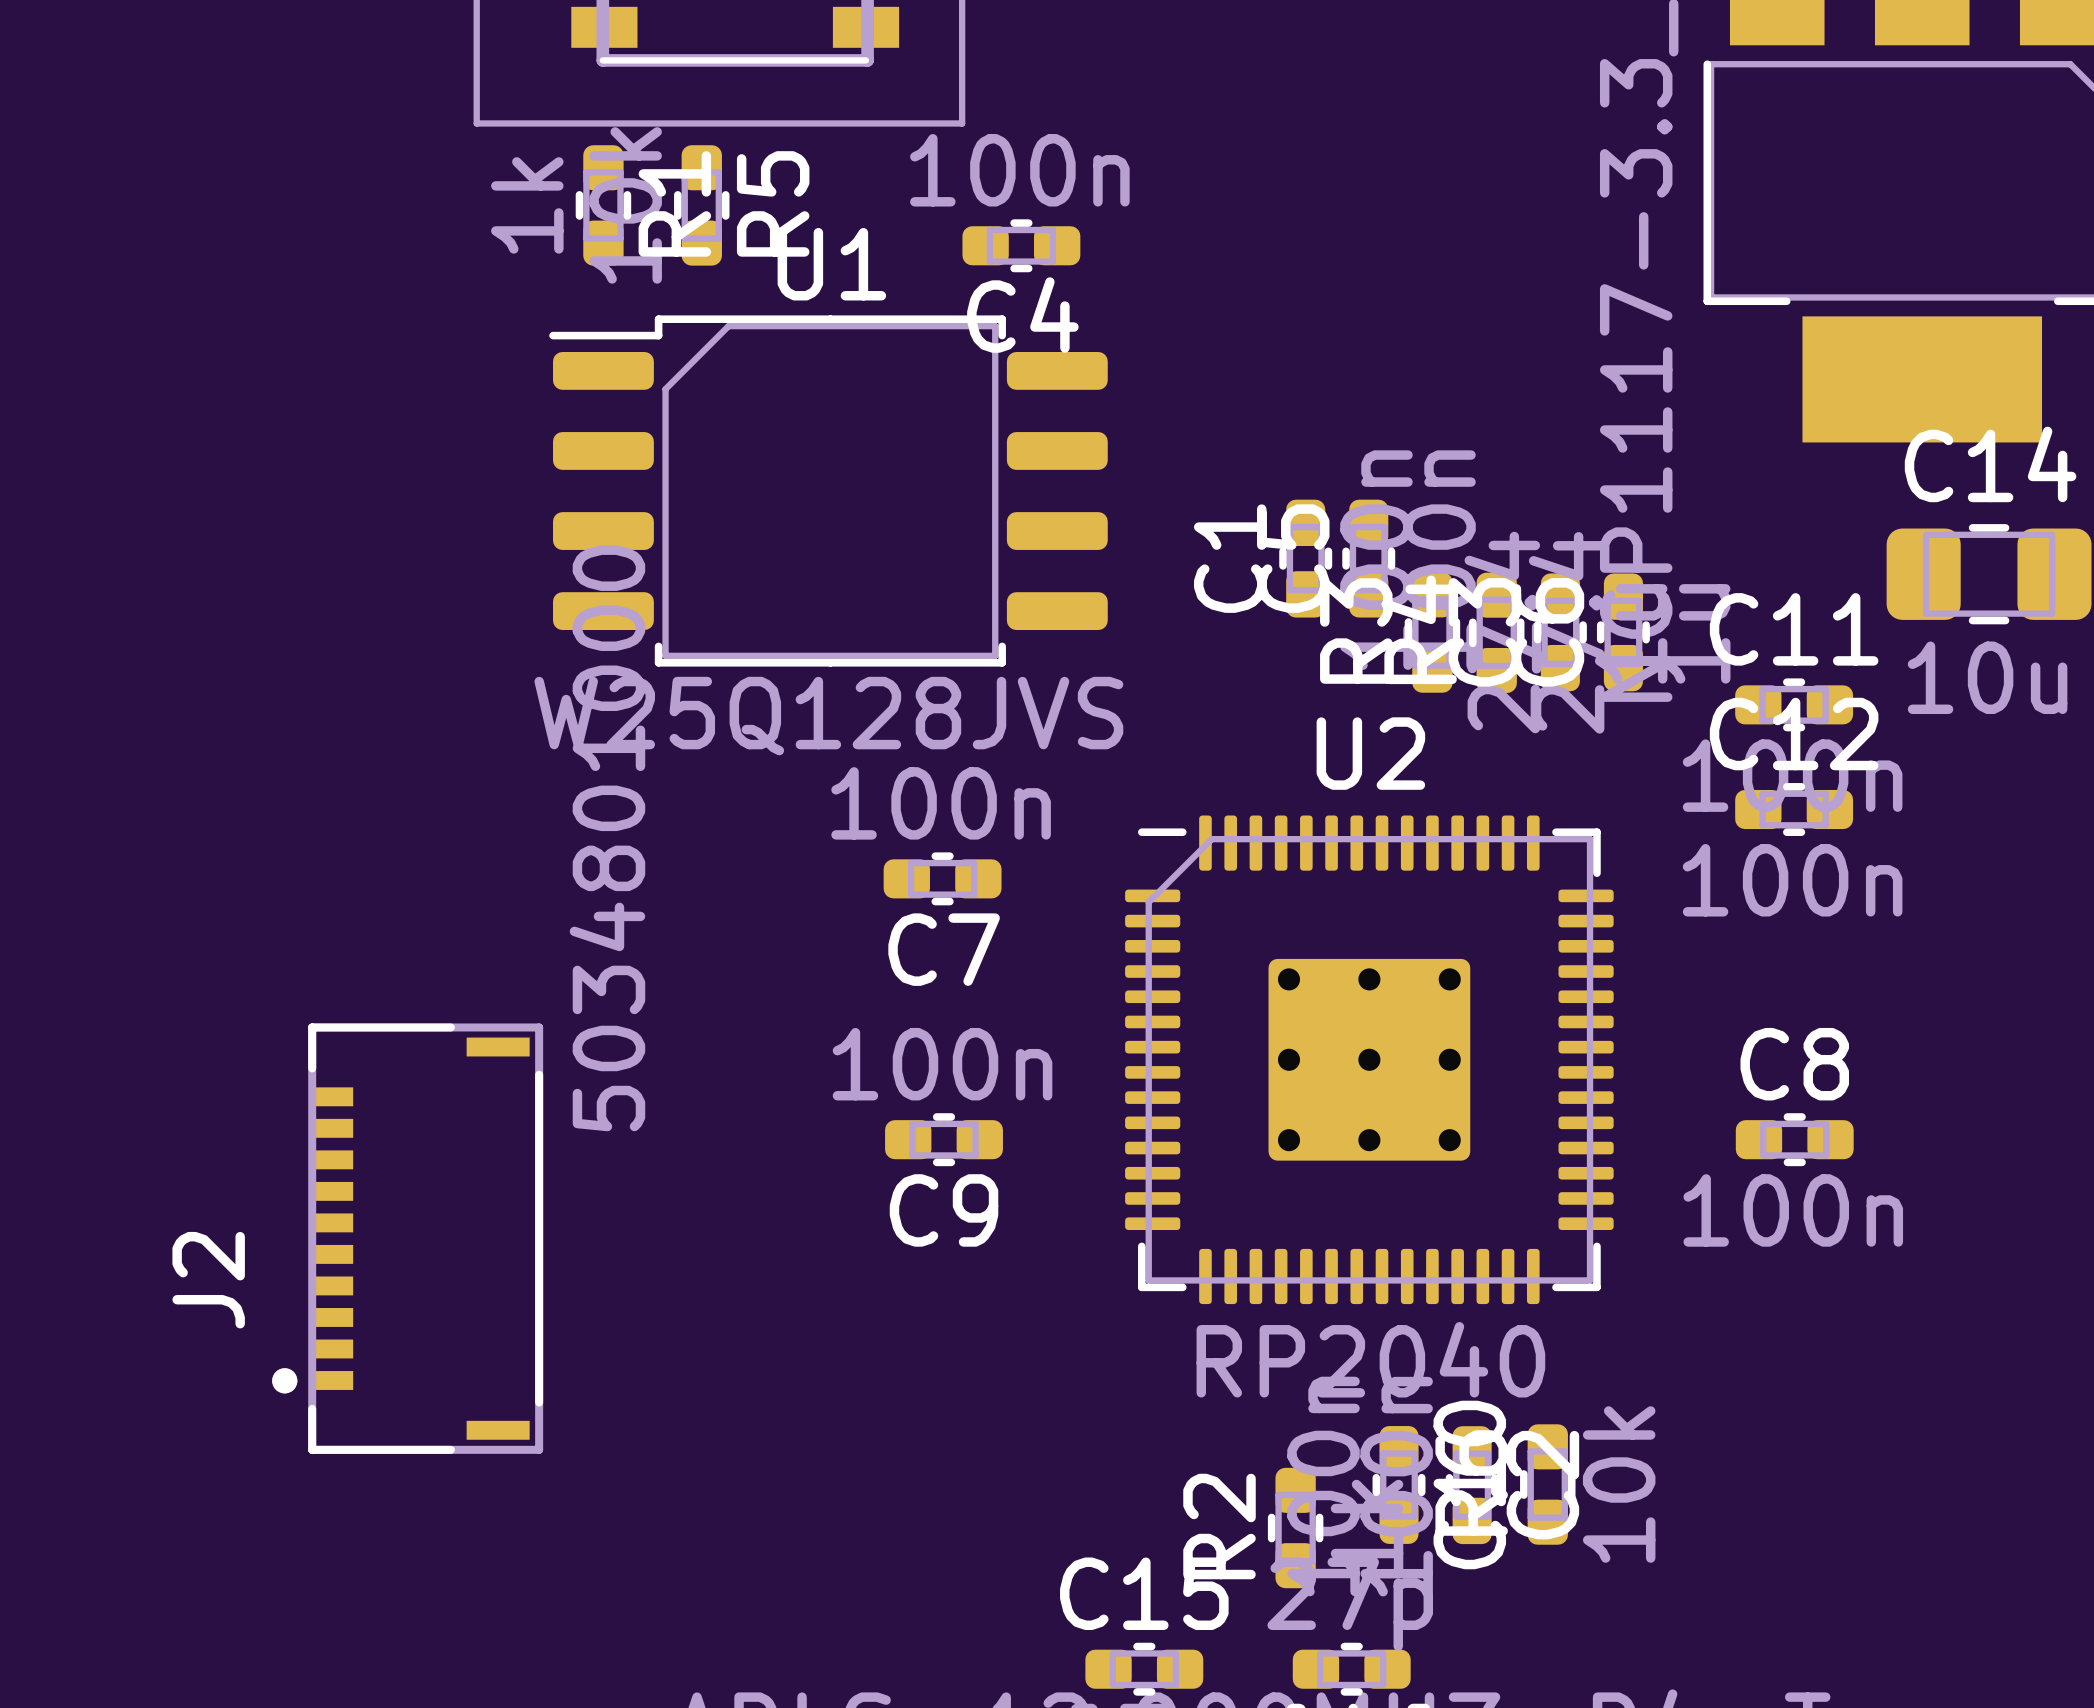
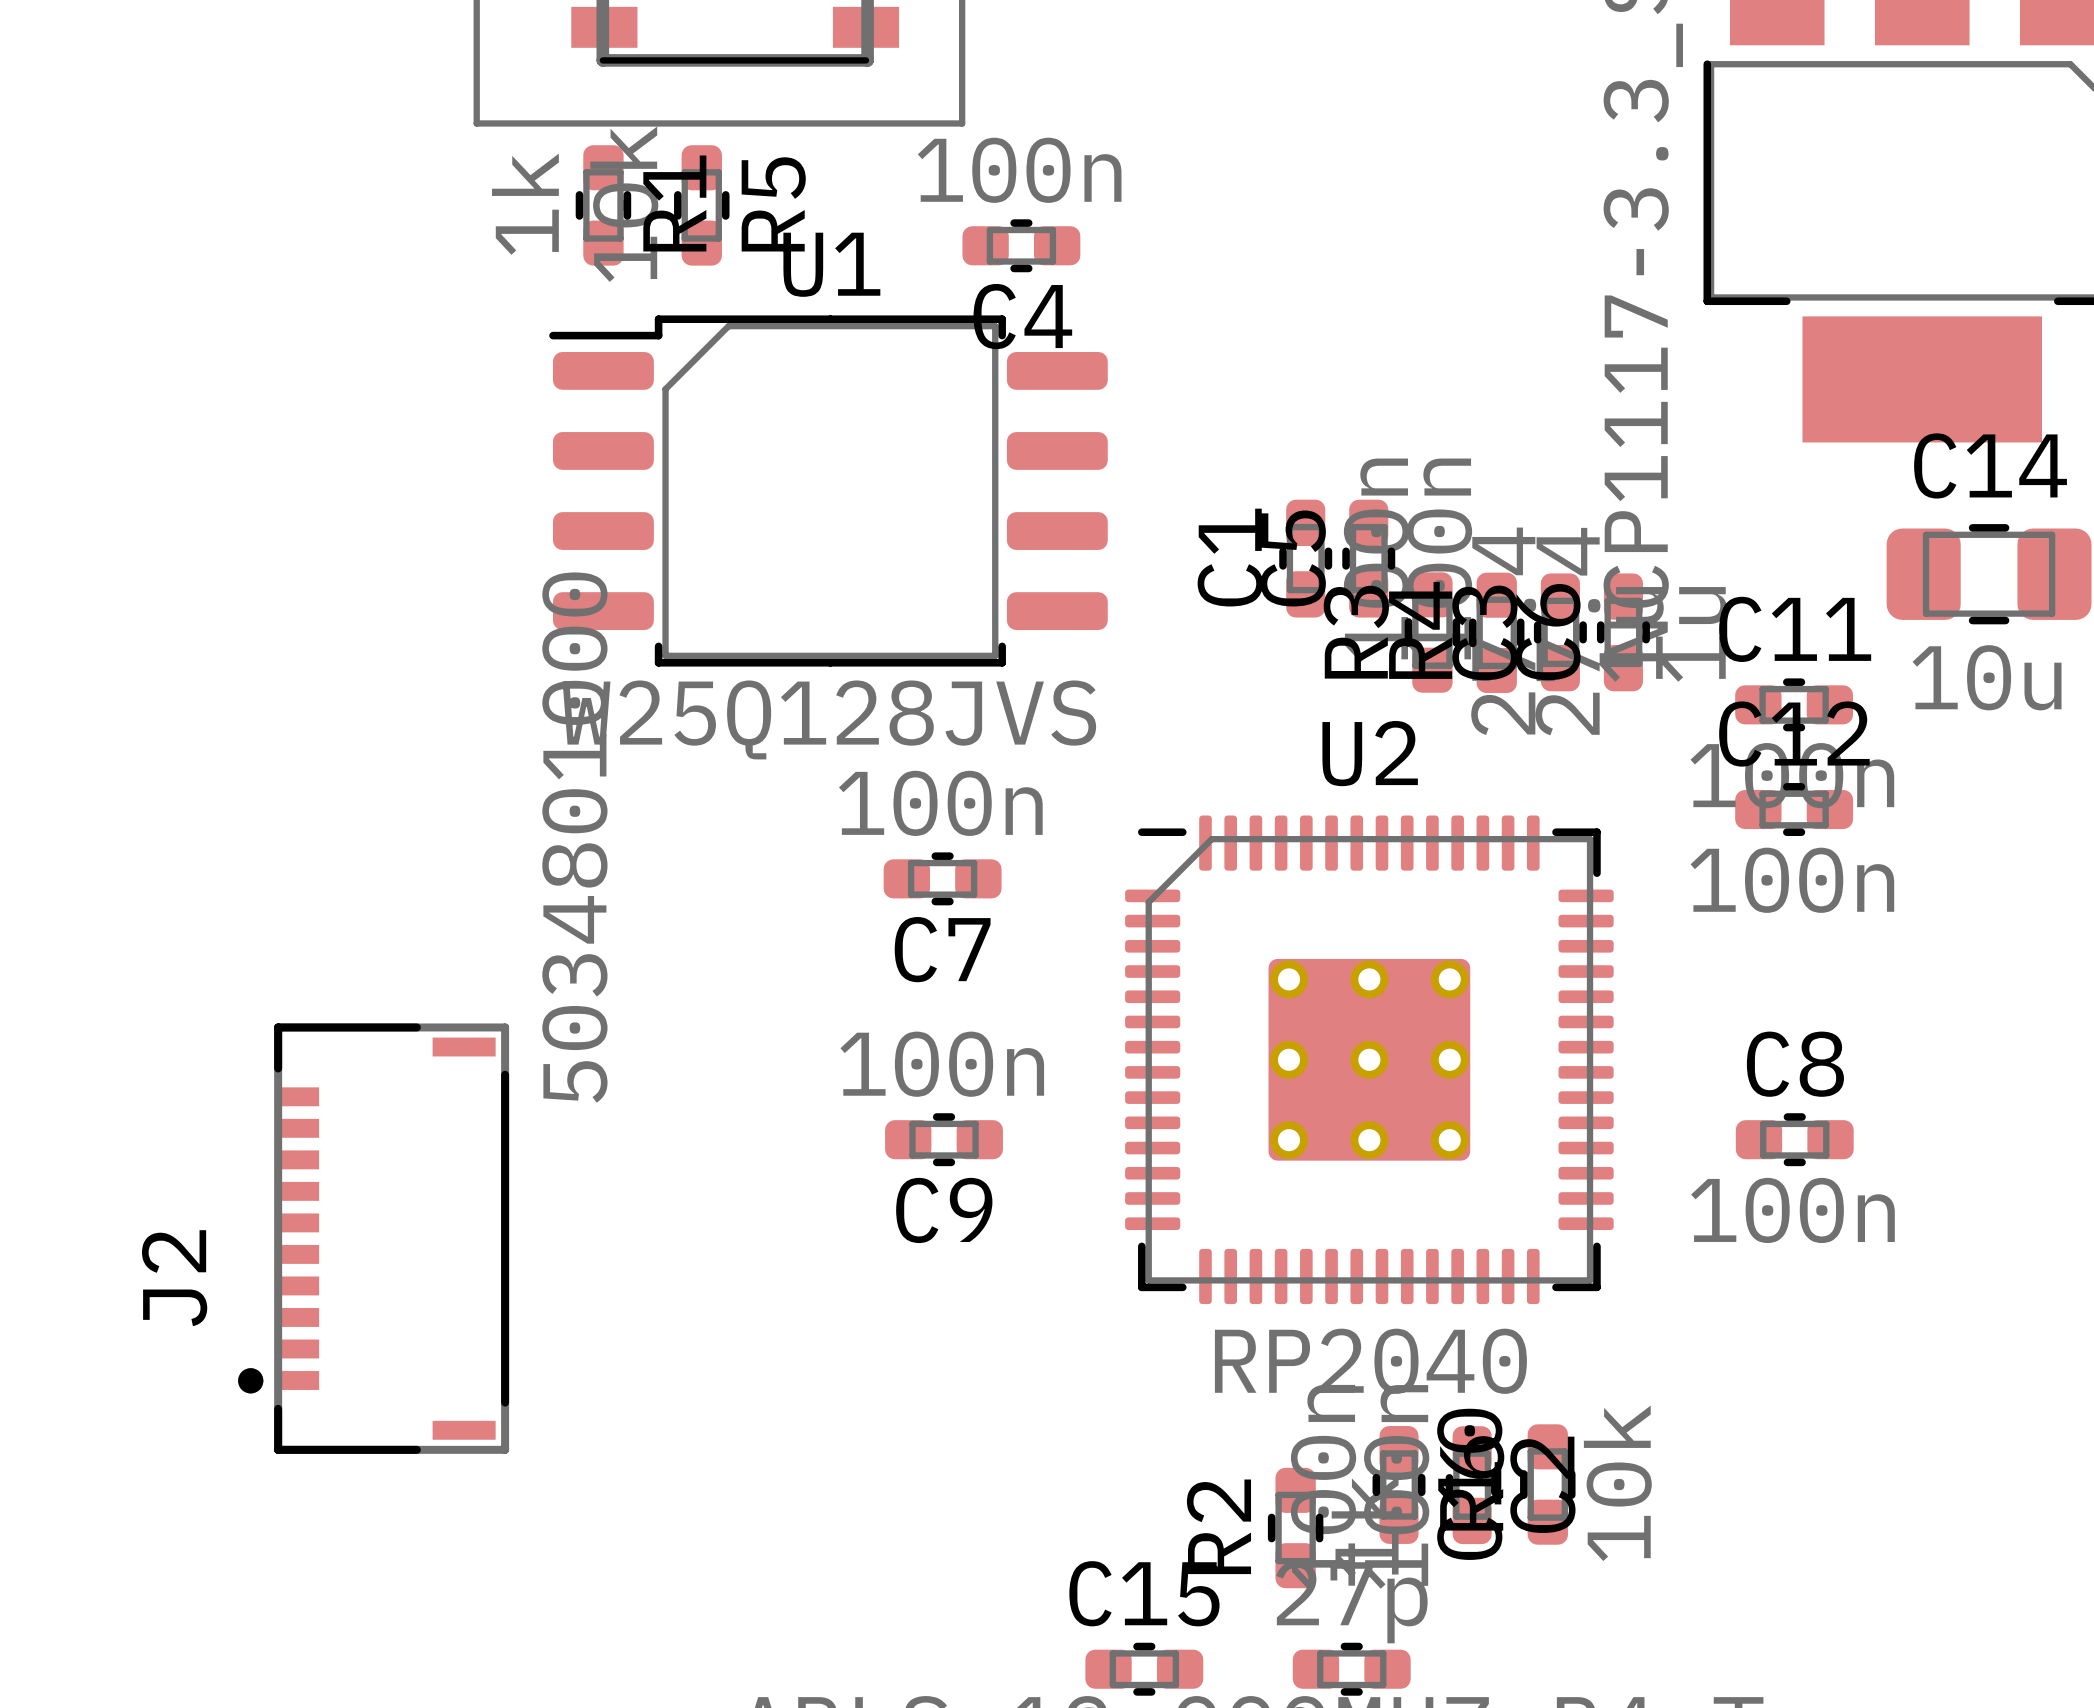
J2 position: (407, 1238) -> (373, 1238)

